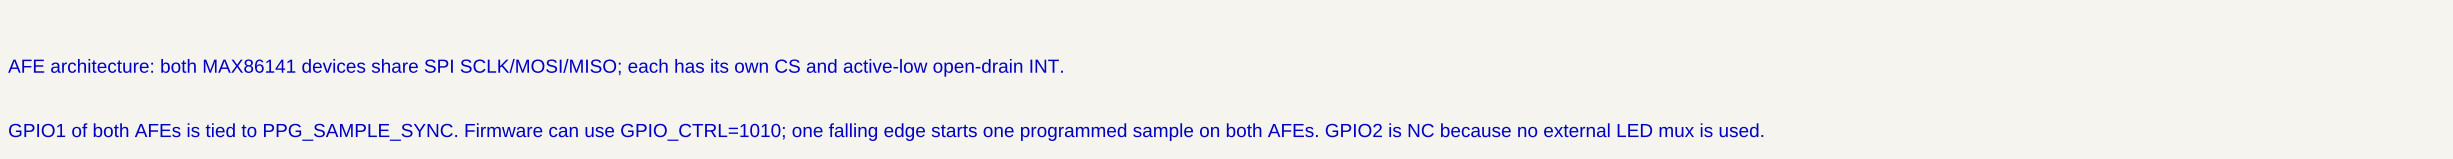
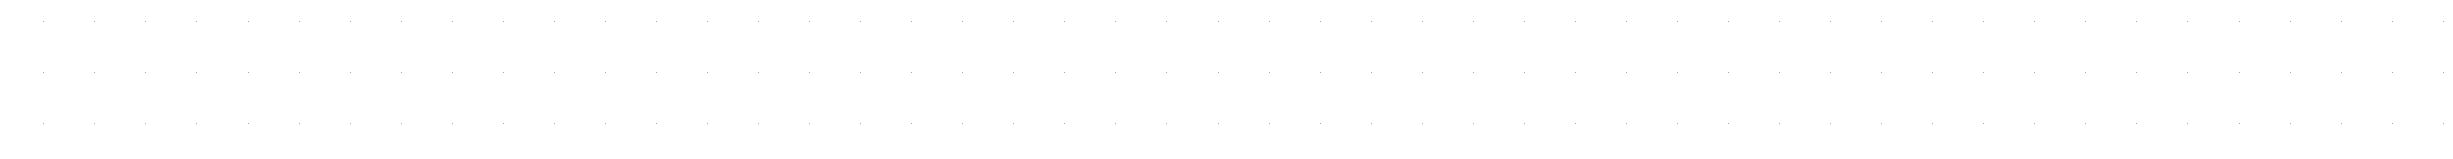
text: AFE architecture: both MAX86141 devices share SPI SCLK/MOSI/MISO; each has its own CS and active-low open-drain INT. (535, 67) -> none
text: GPIO1 of both AFEs is tied to PPG_SAMPLE_SYNC. Firmware can use GPIO_CTRL=1010; one falling edge starts one programmed sample on both AFEs. GPIO2 is NC because no external LED mux is used. (886, 132) -> none

